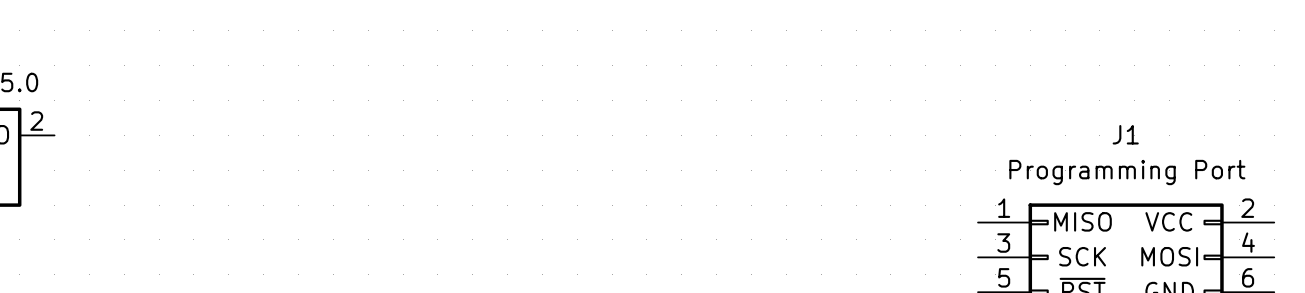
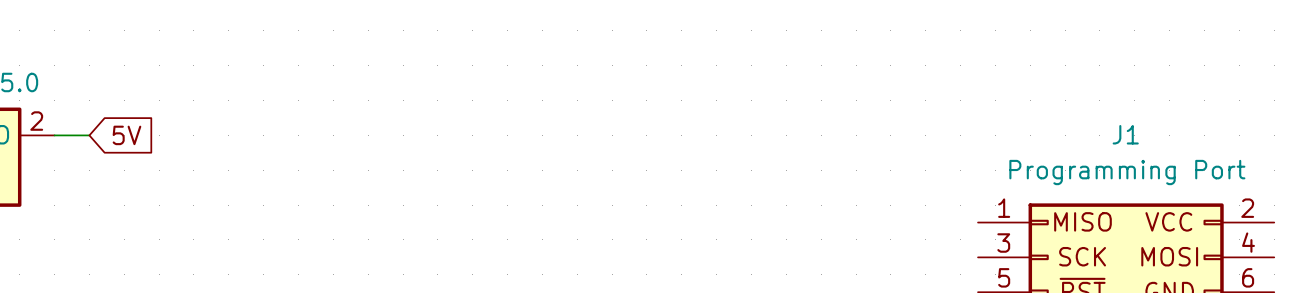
wire: none -> (54, 135) (89, 135)
global label: none -> 5V (126, 135)

